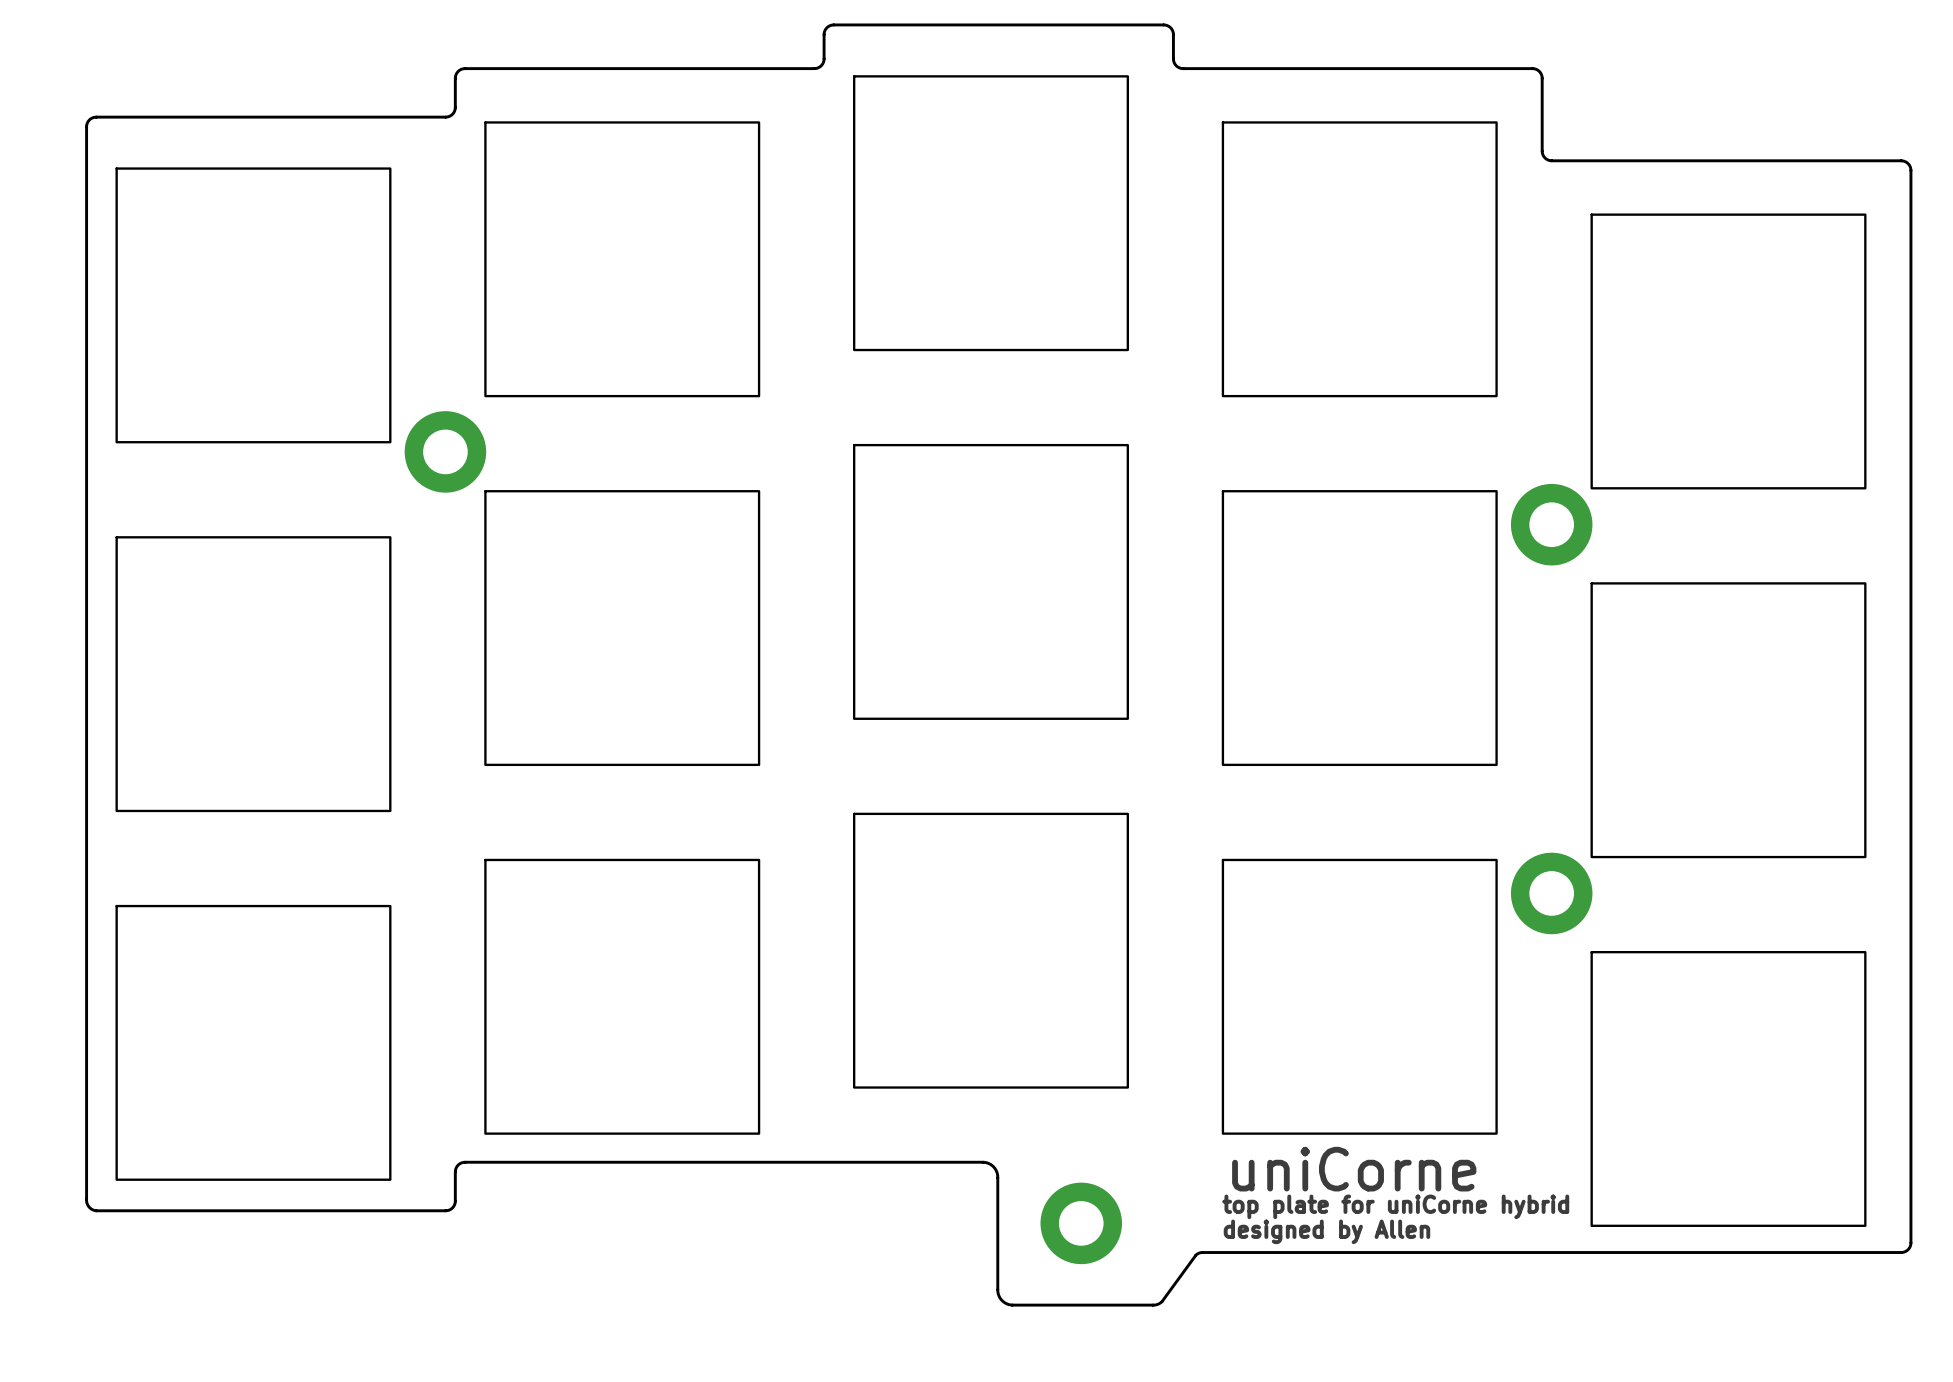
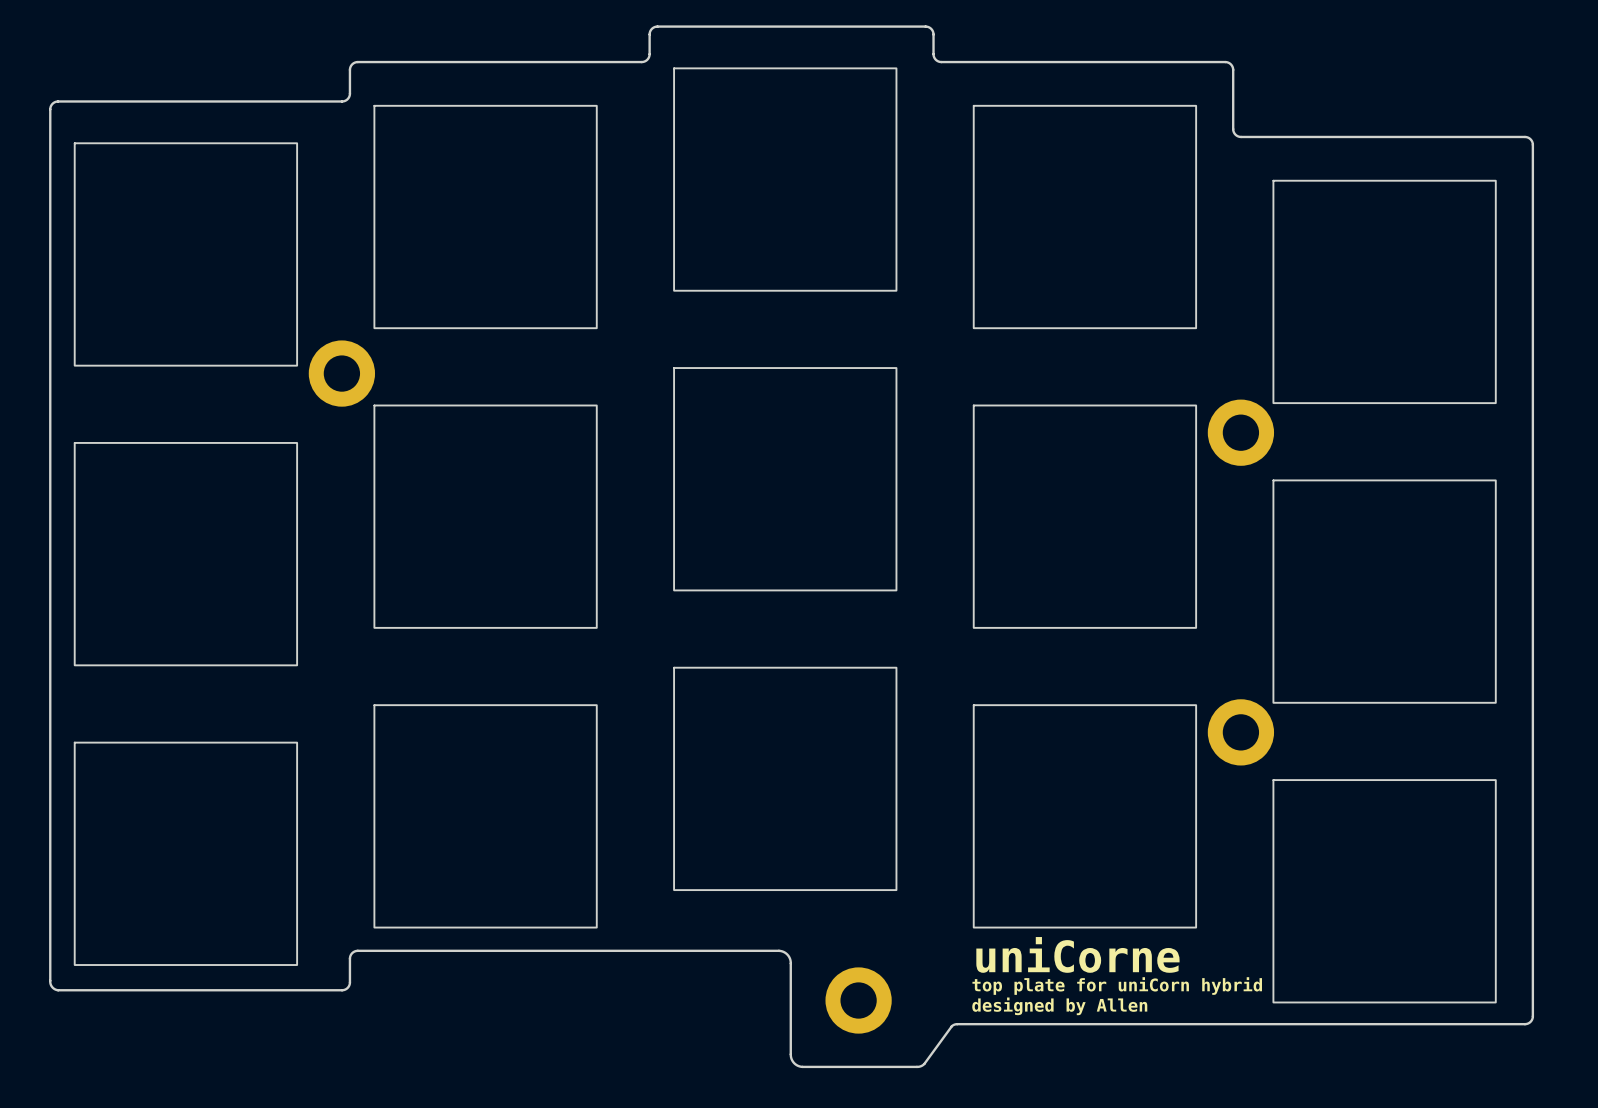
text: top plate for uniCorne hybrid (1395, 1206) -> top plate for uniCorn hybrid (1117, 986)

